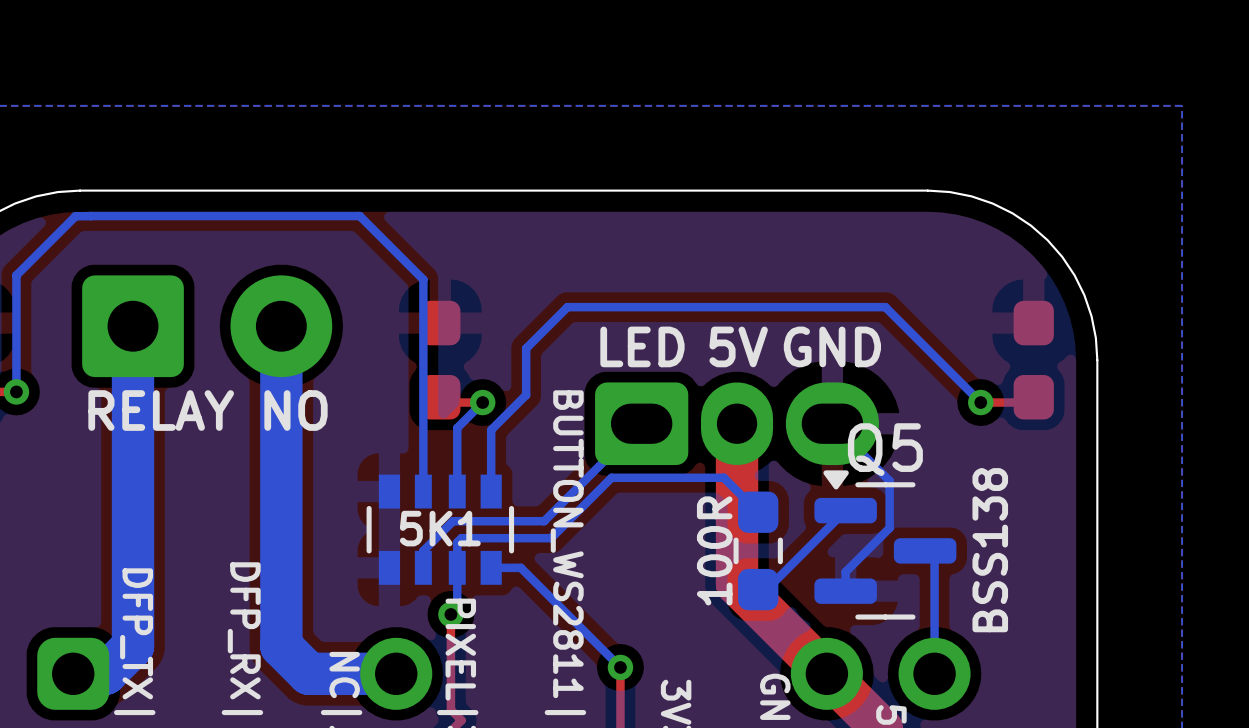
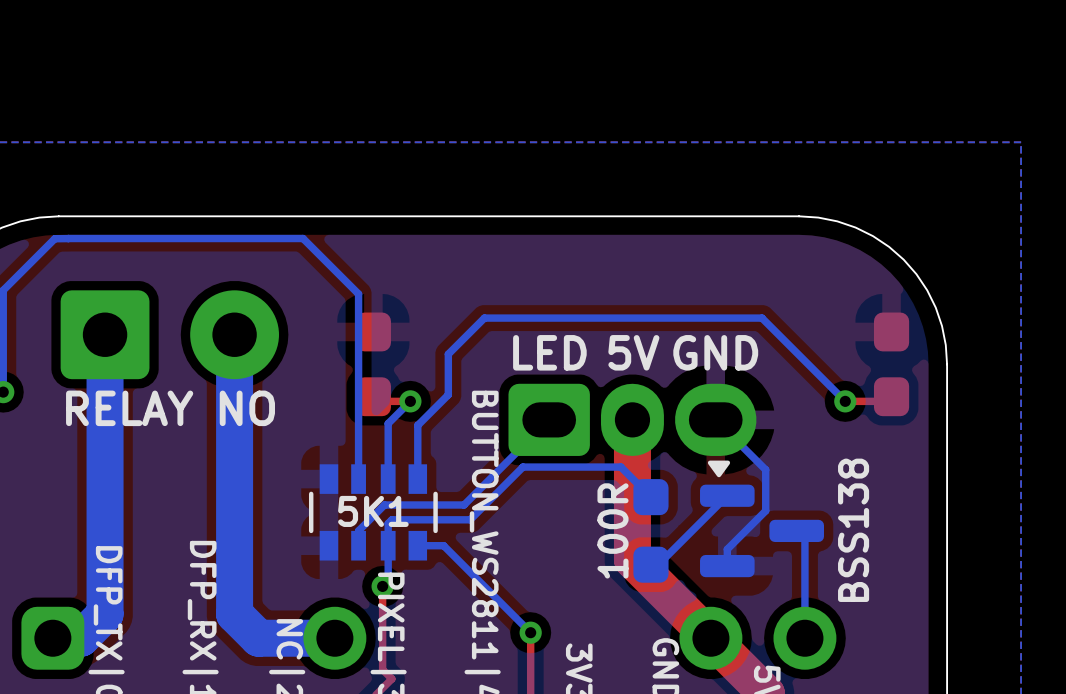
part footprint: [733, 491, 783, 611] -> [633, 479, 669, 583]
Q5: (885, 544) -> none

